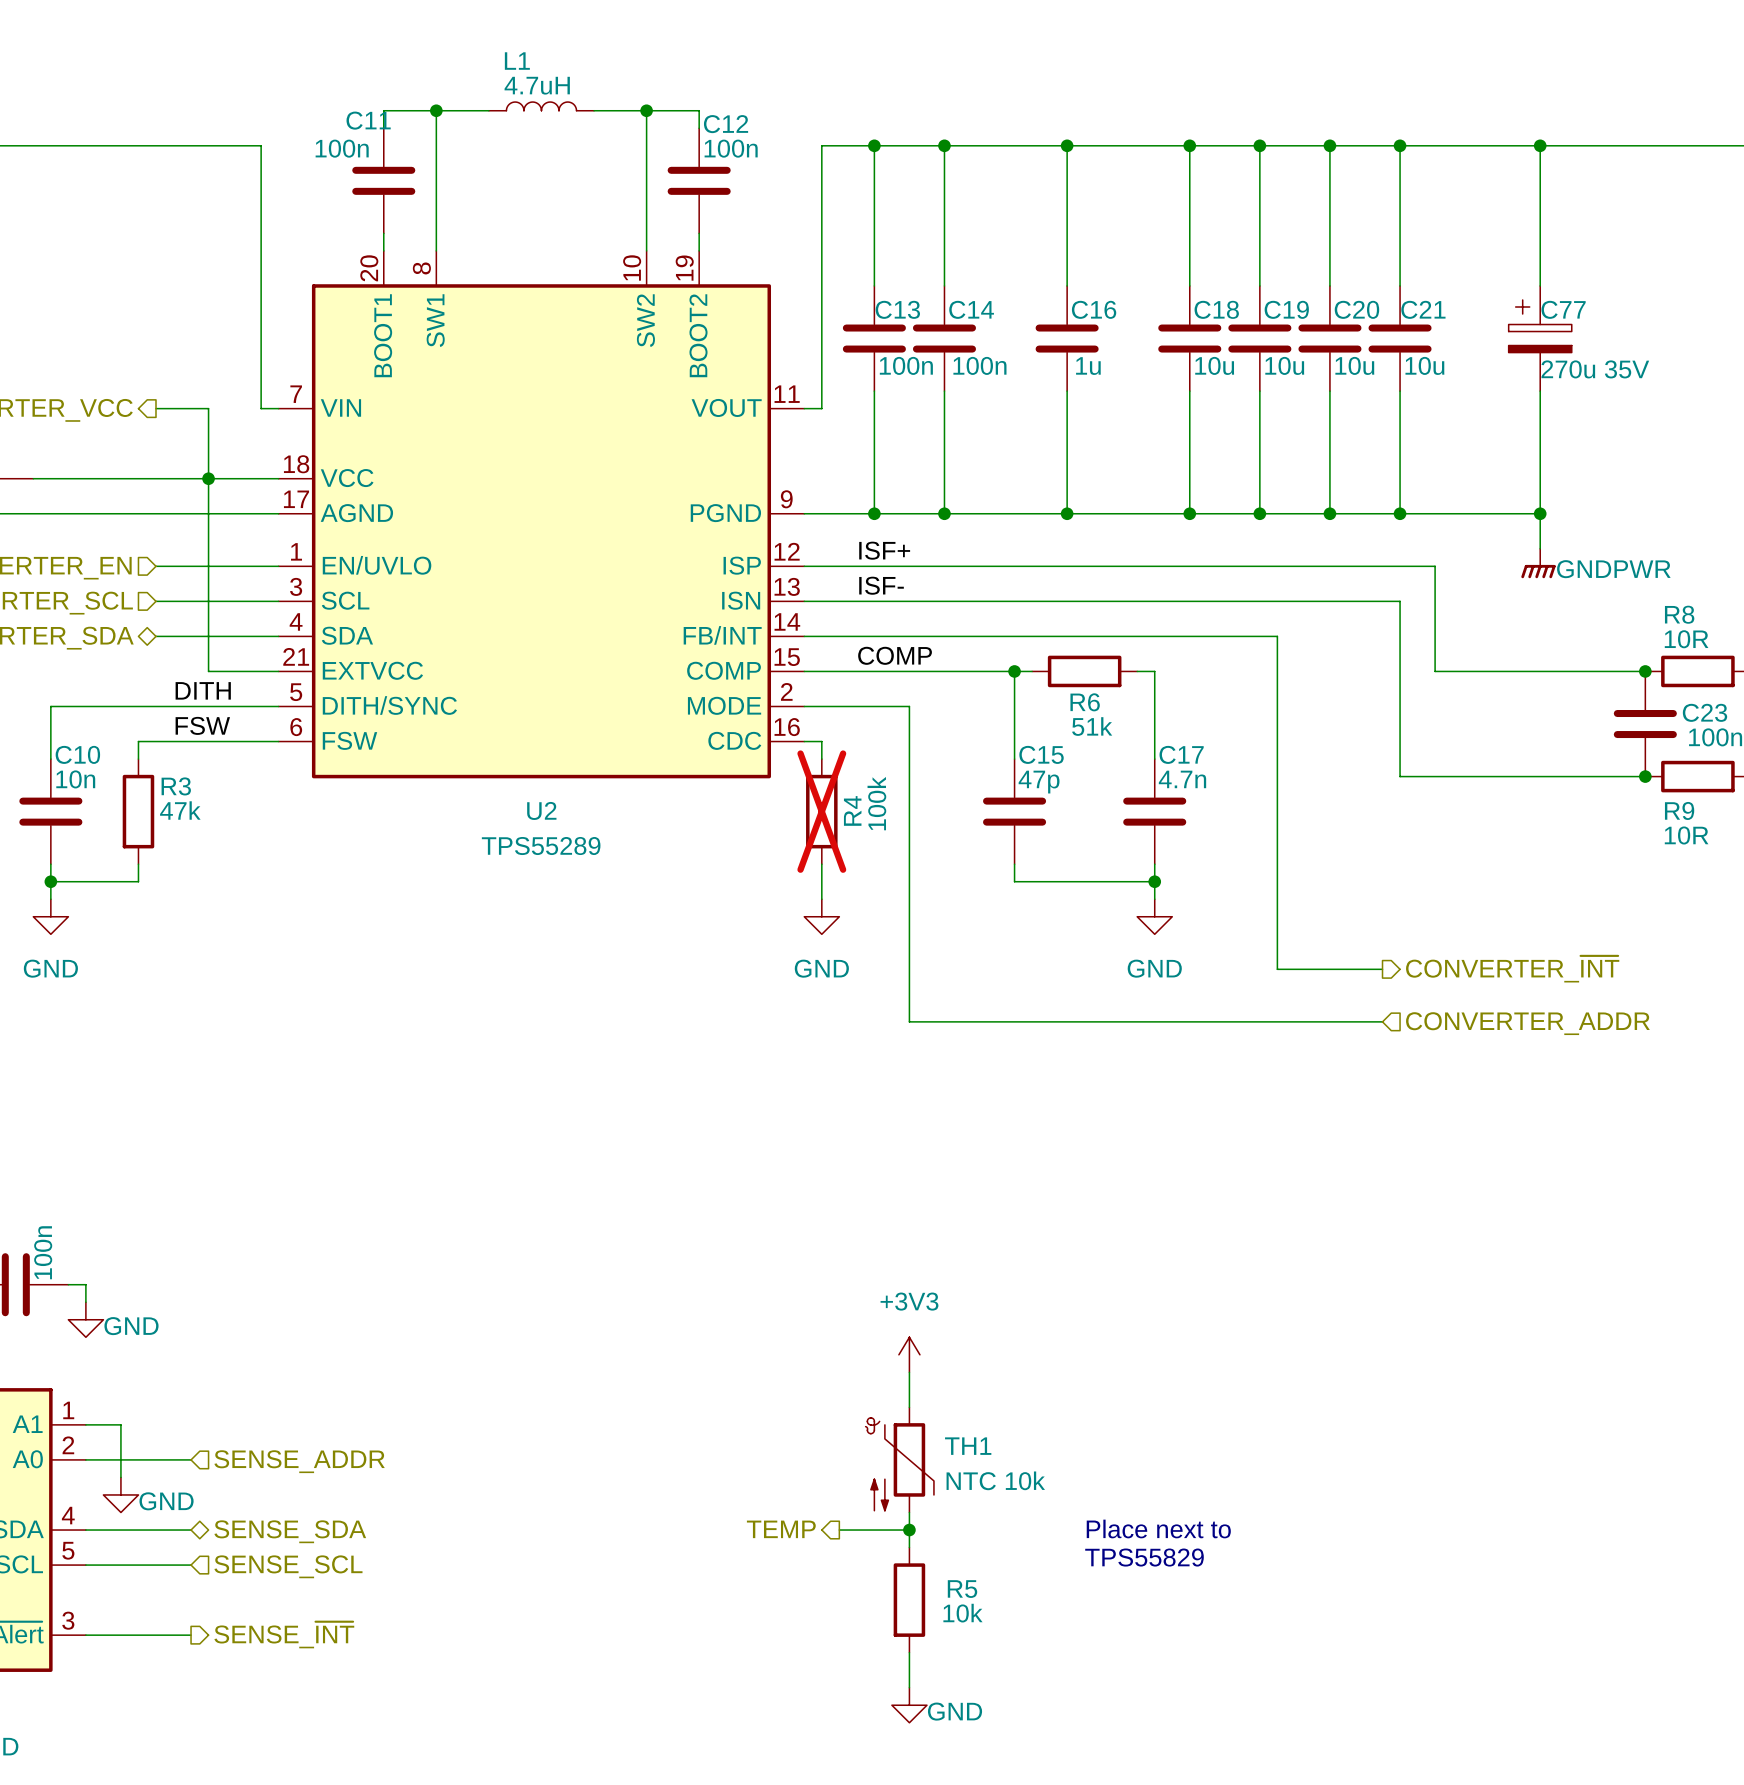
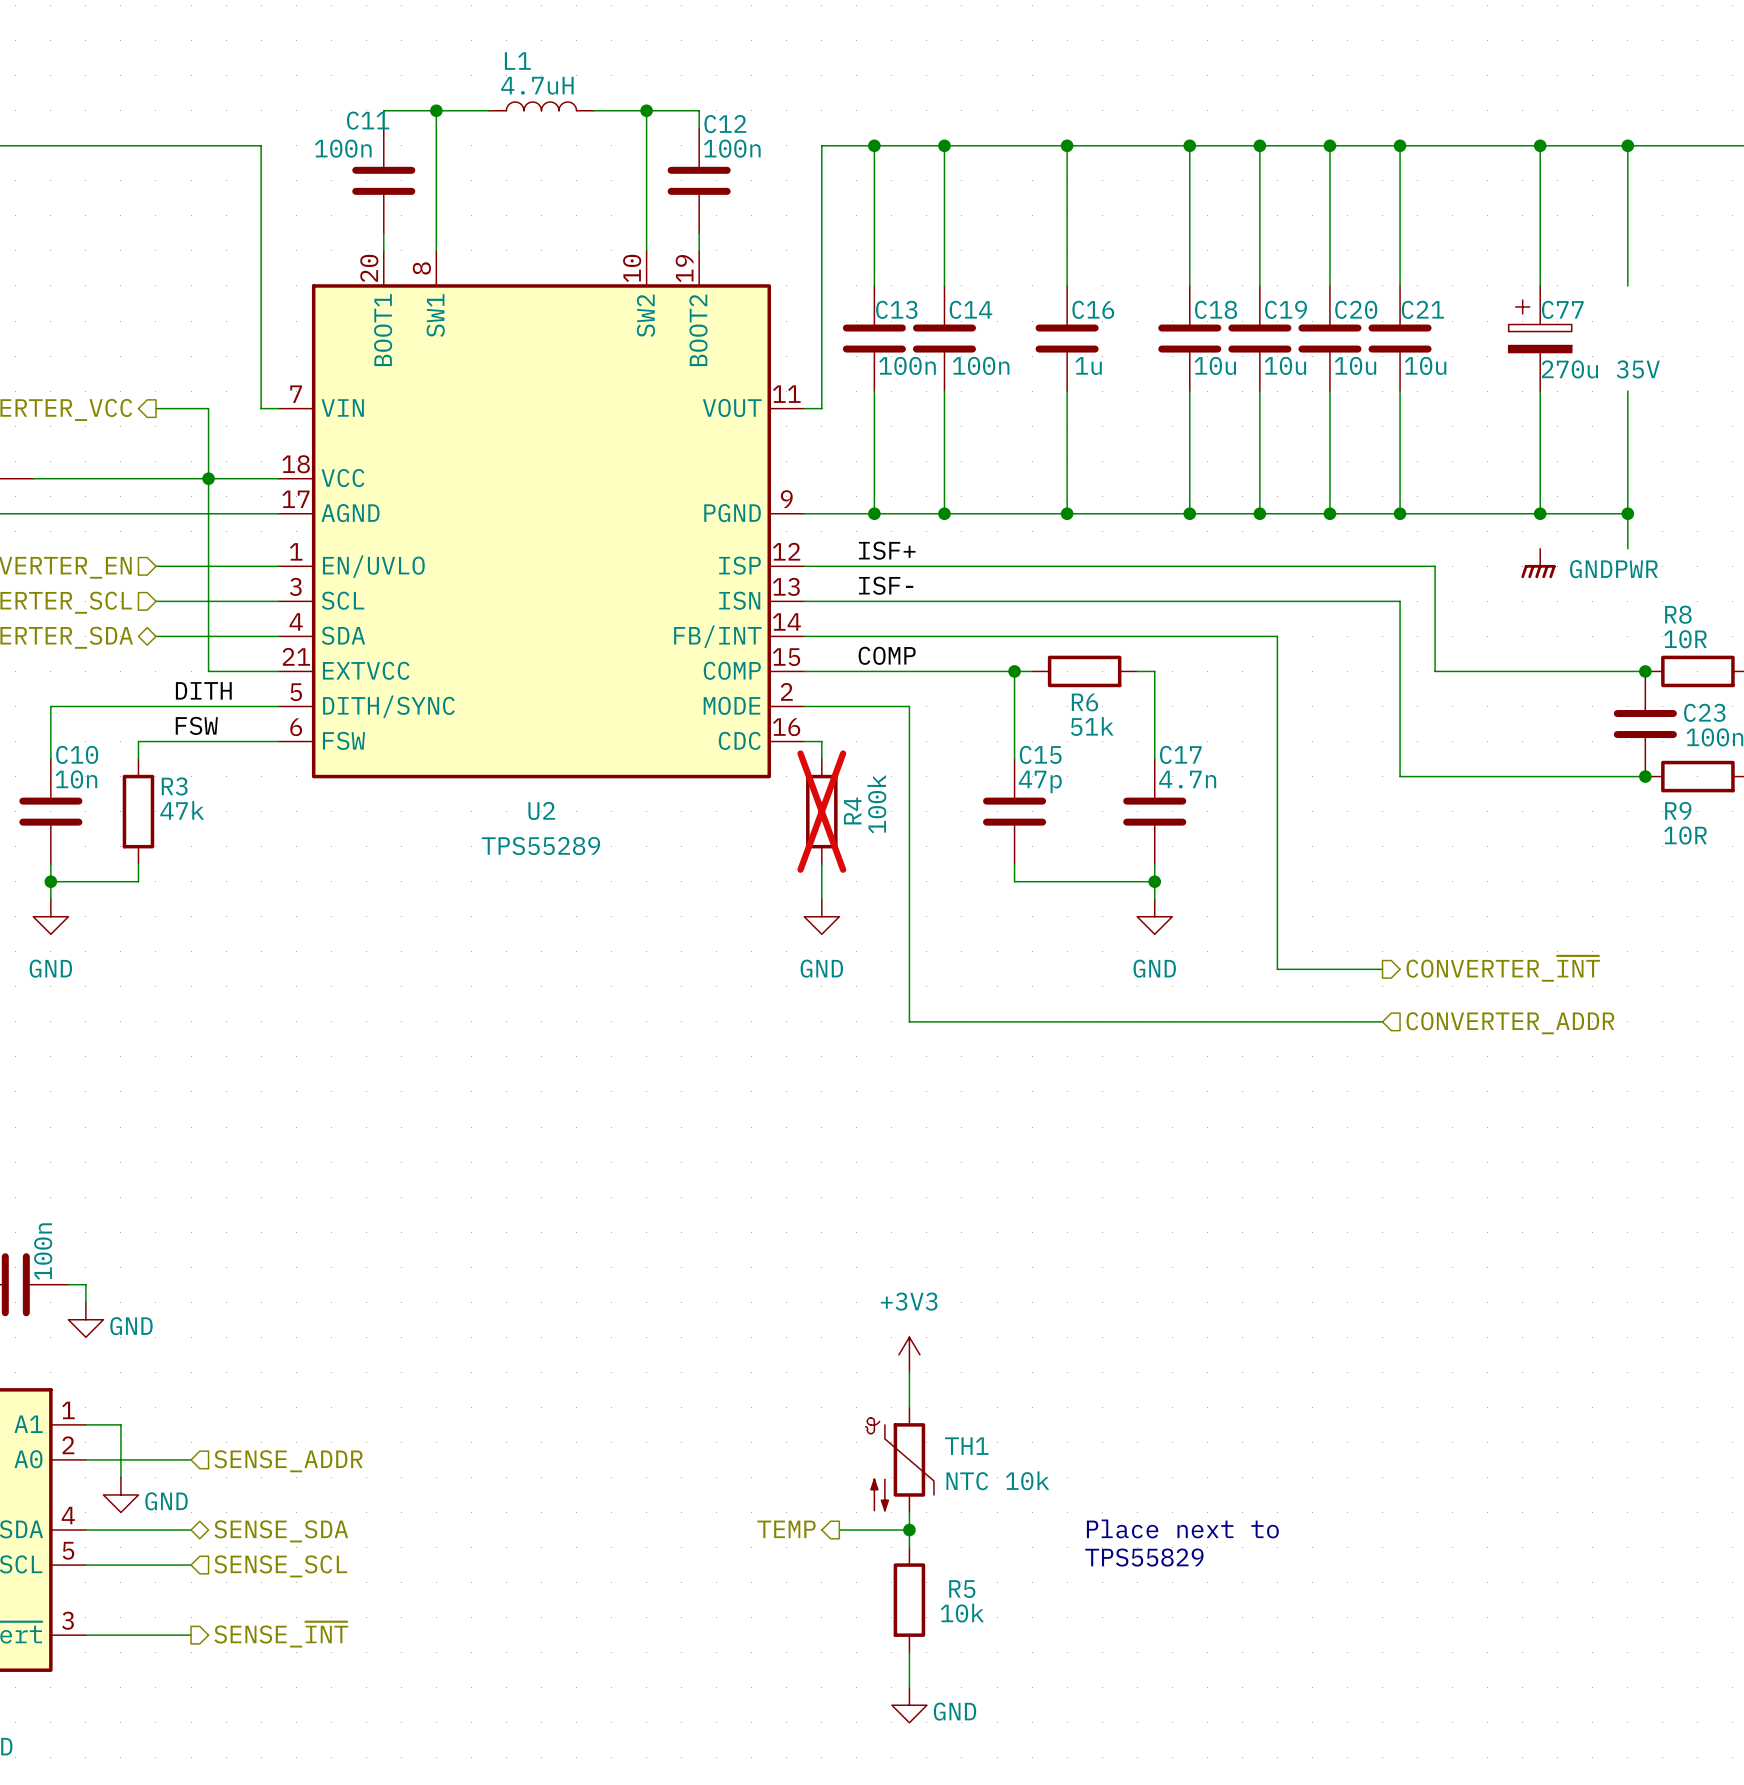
wire: none -> (1627, 145) (1627, 285)
junction: none -> (1627, 145)
wire: none -> (1627, 391) (1627, 548)
wire: (1540, 513) (1540, 548) -> (1540, 513) (1627, 513)
junction: none -> (1627, 513)

